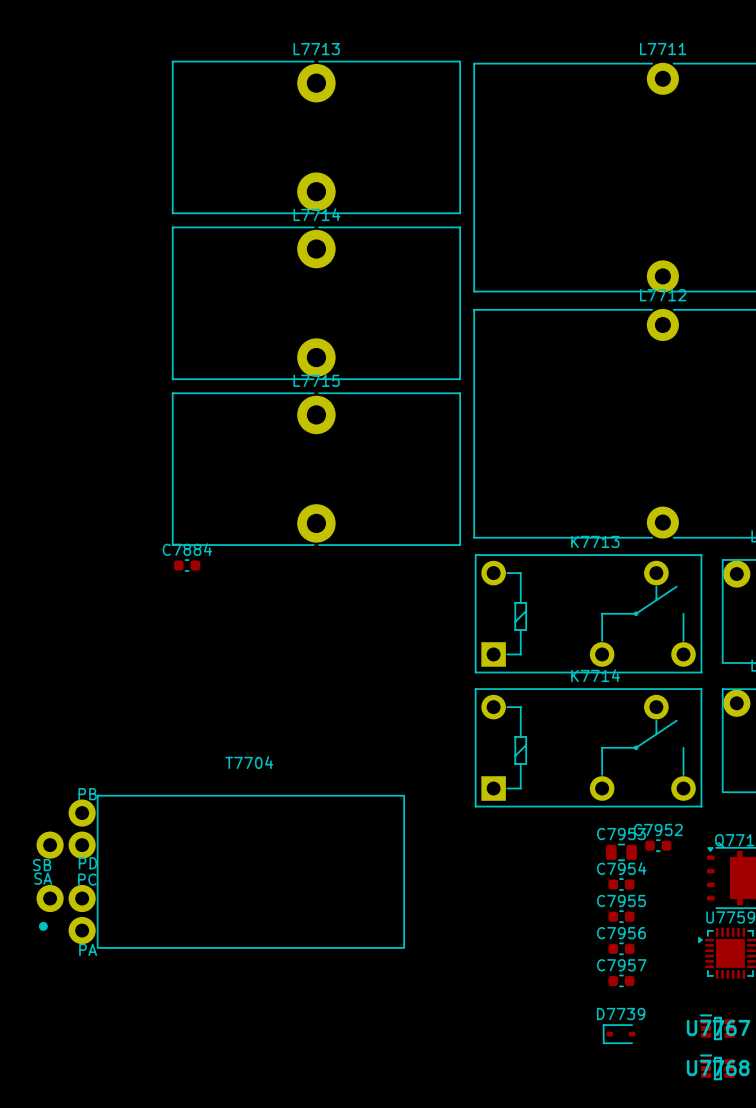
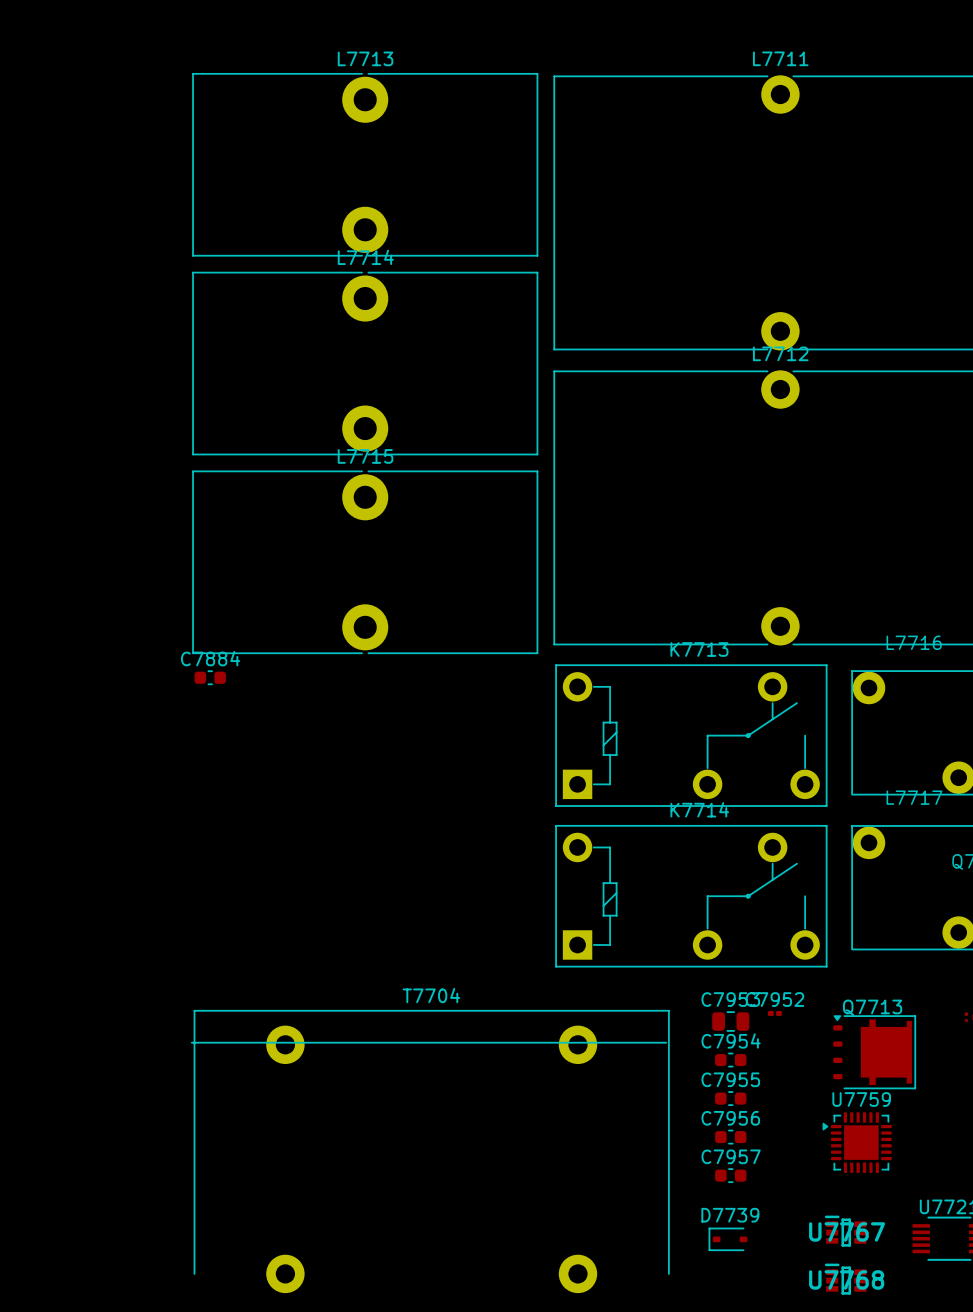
T7704 name position: T7704 (249, 762) -> T7704 (431, 995)
T7704 footprint: [36, 795, 405, 949] -> [190, 1010, 670, 1294]
C7952 footprint: [645, 839, 672, 852] -> [767, 1010, 782, 1017]

